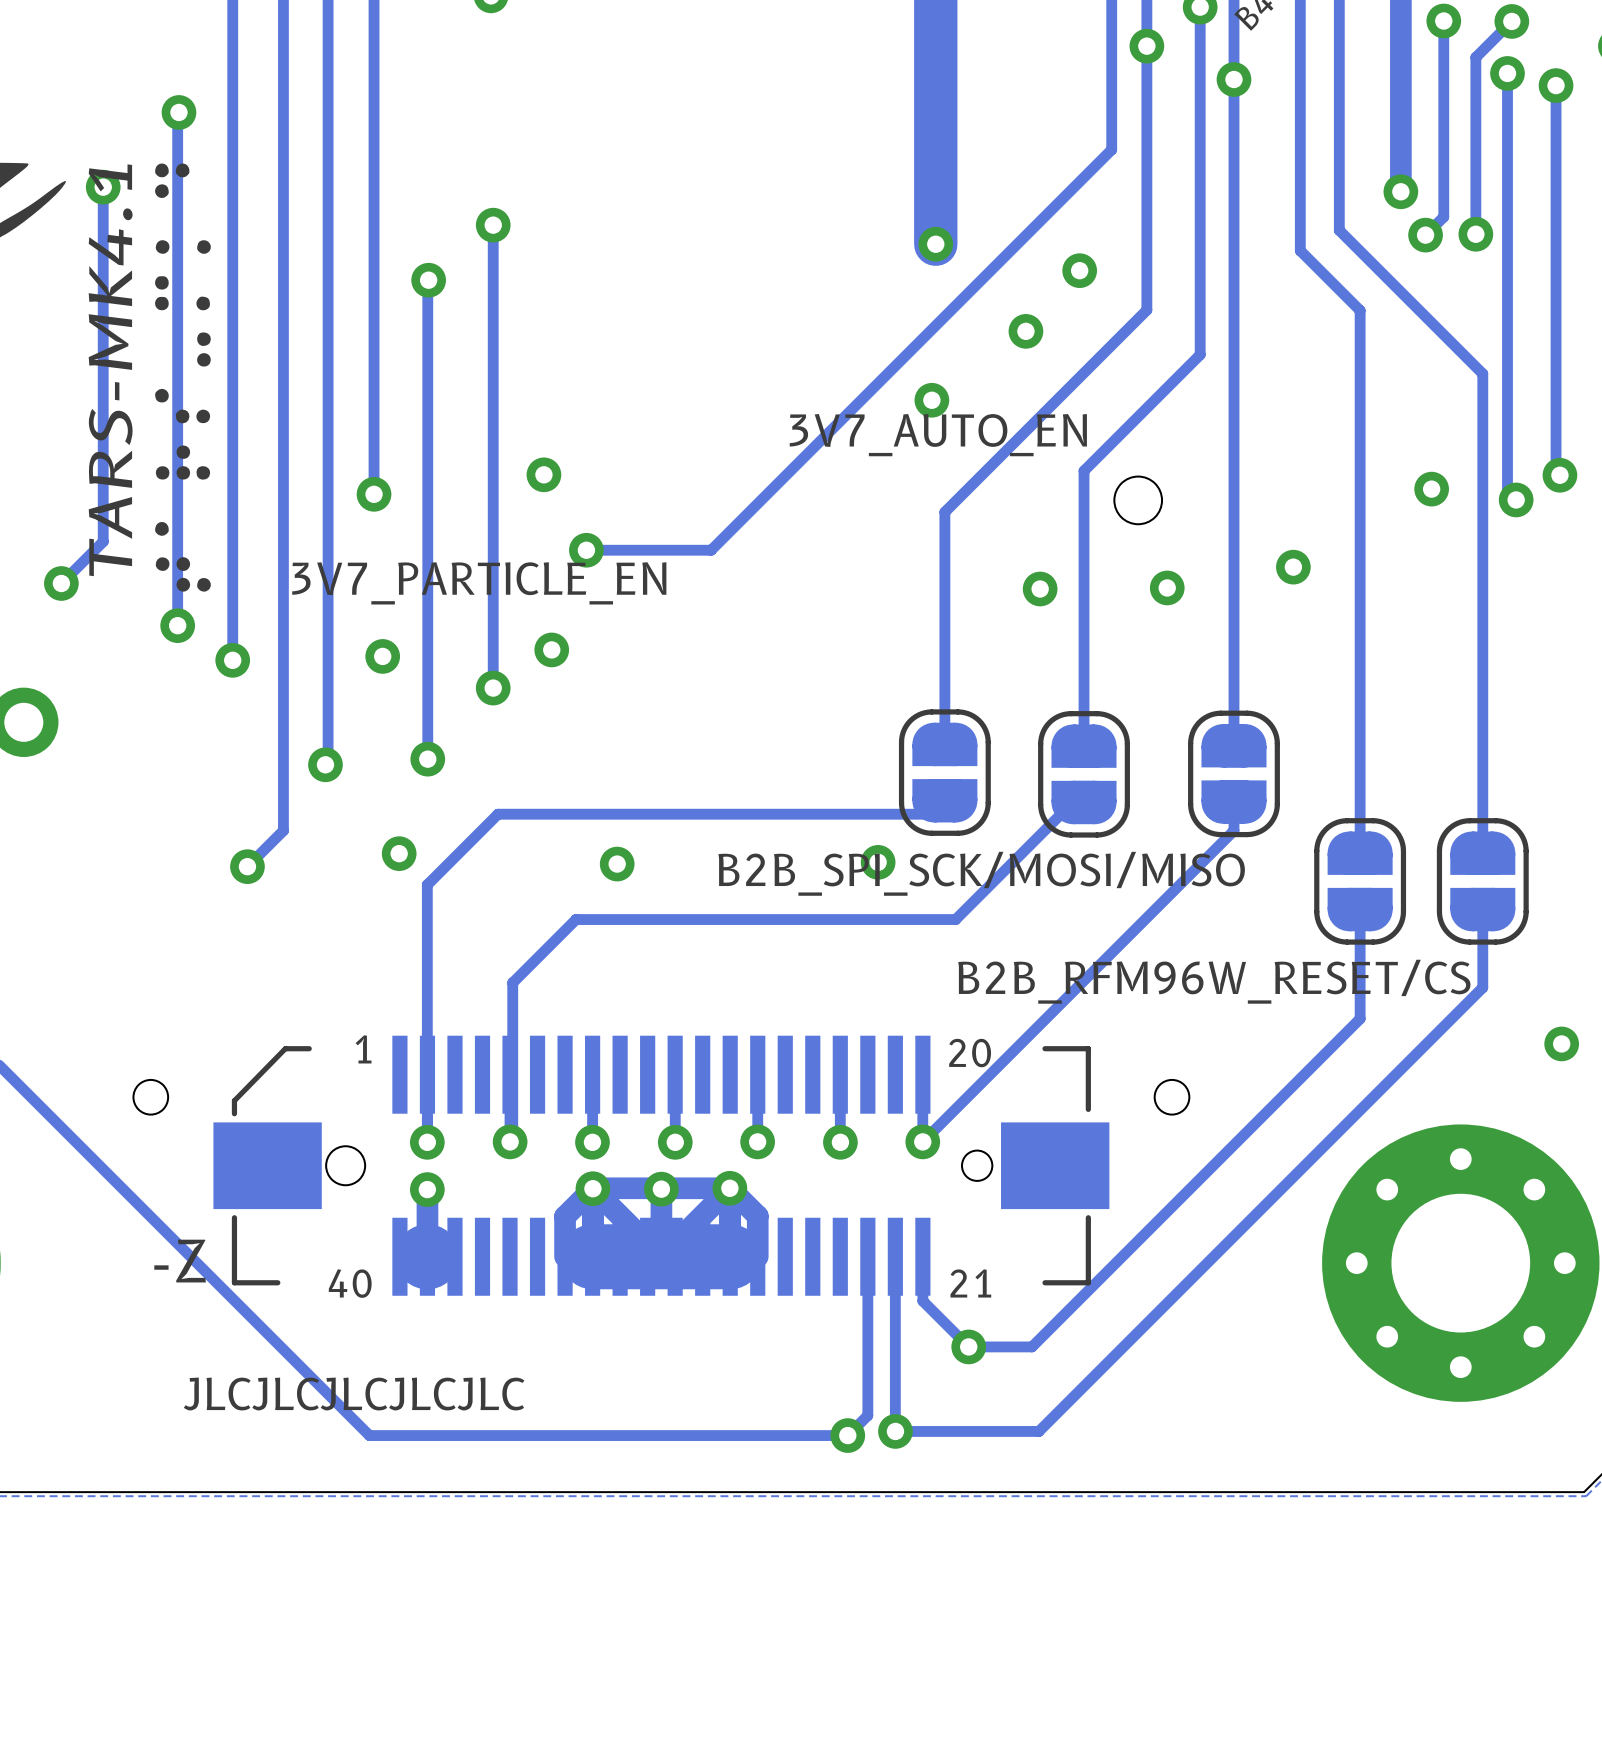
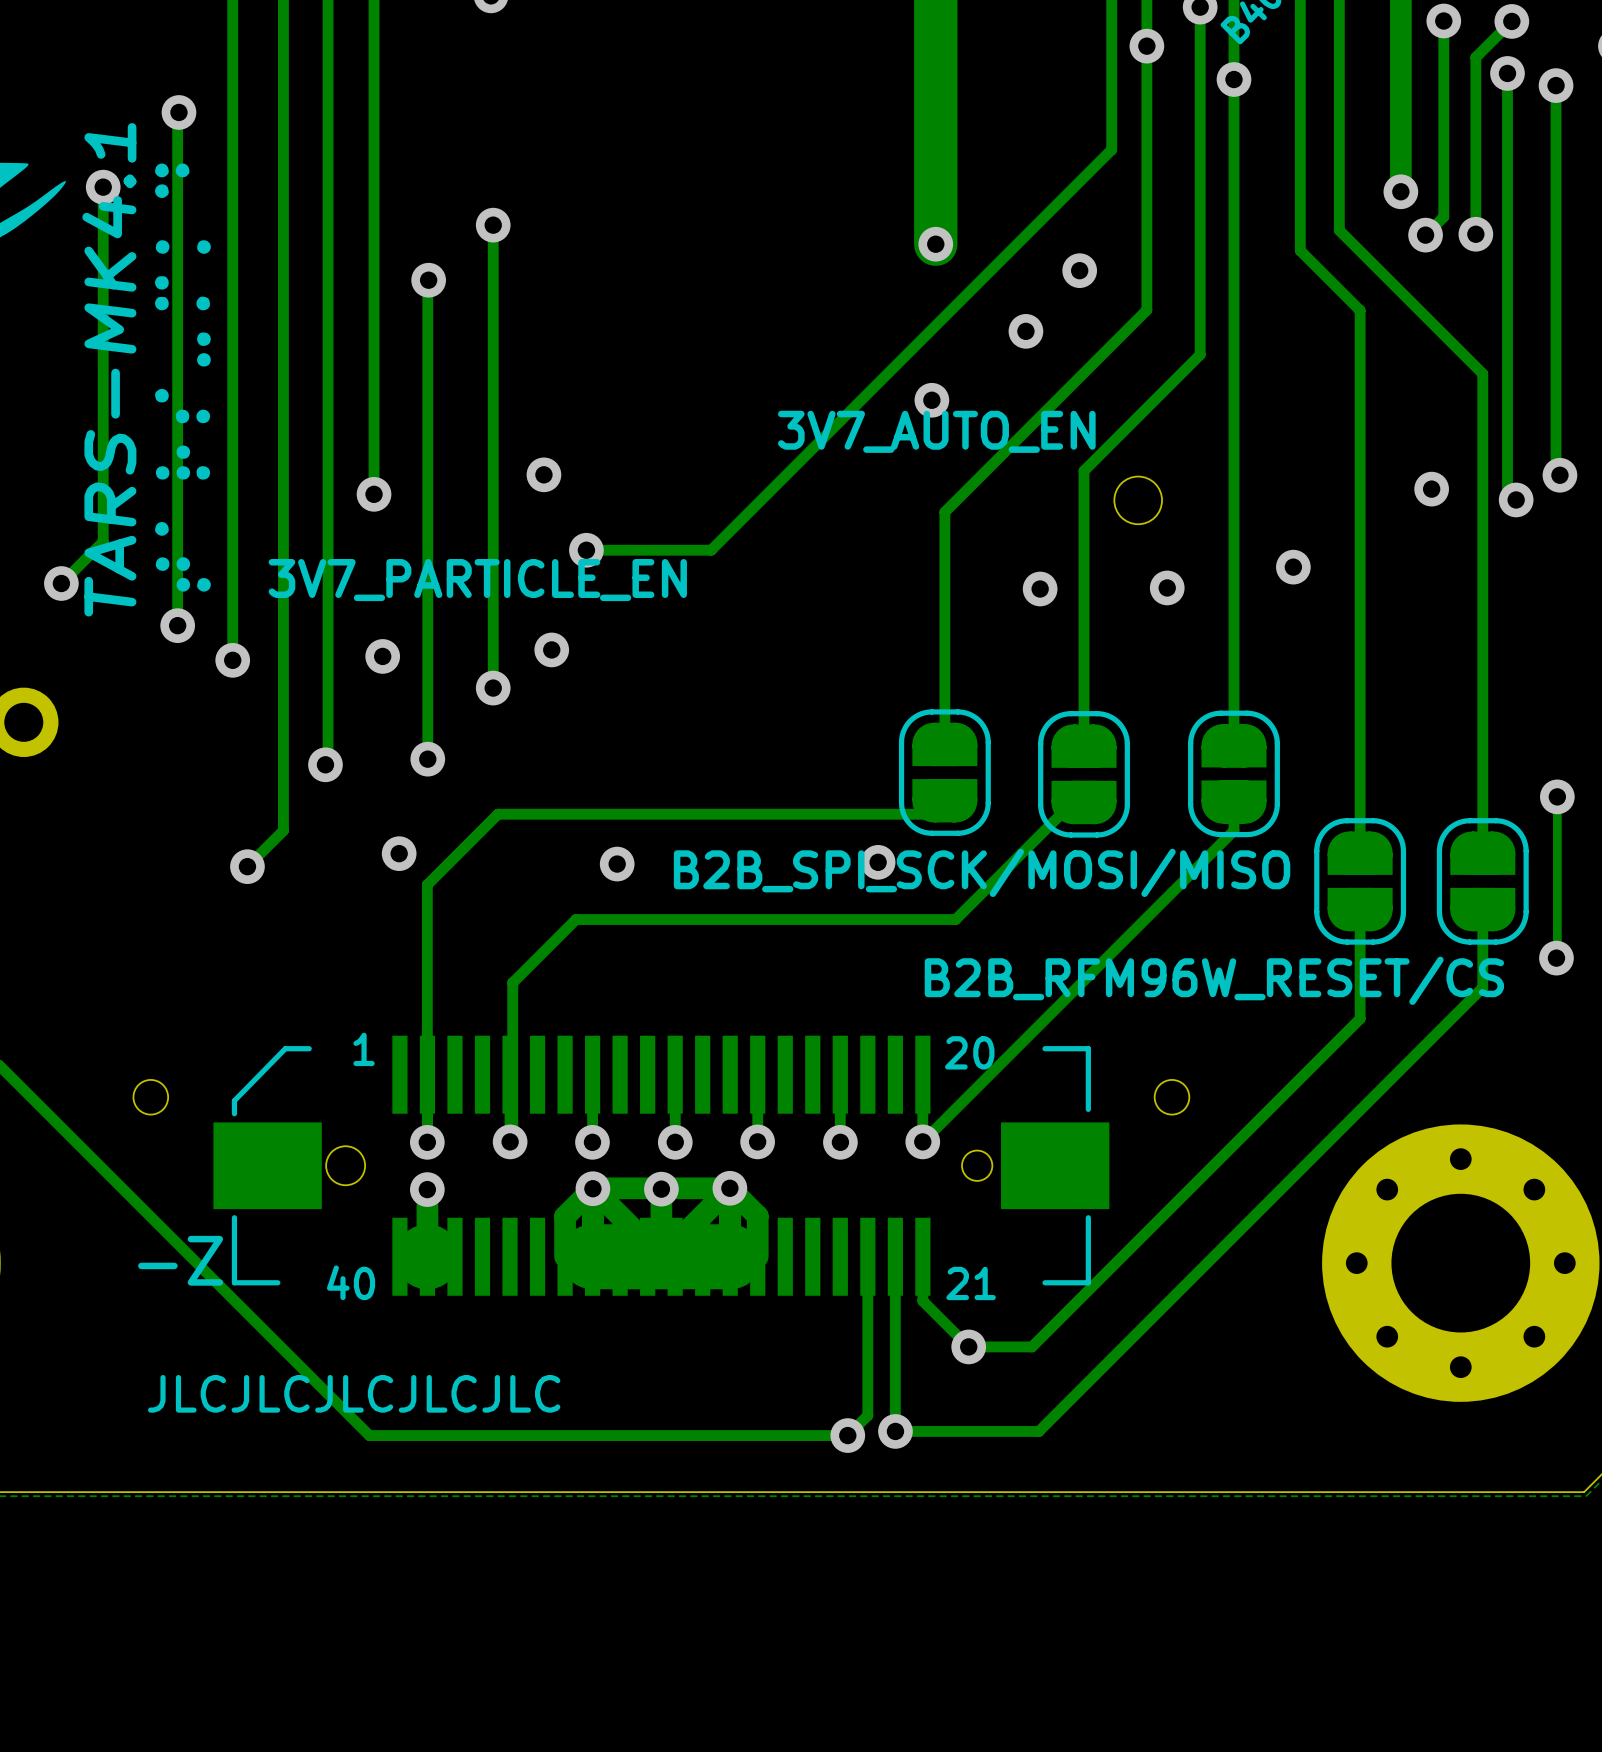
track: none -> (1557, 796) (1556, 958)
via: none -> (1557, 796)
via: none -> (1556, 958)
via: (1561, 1043) -> none

